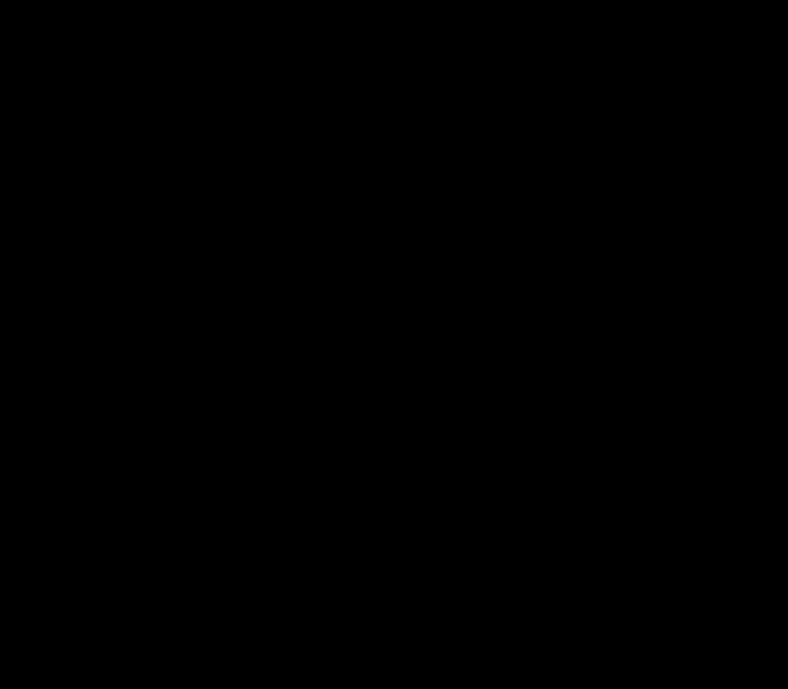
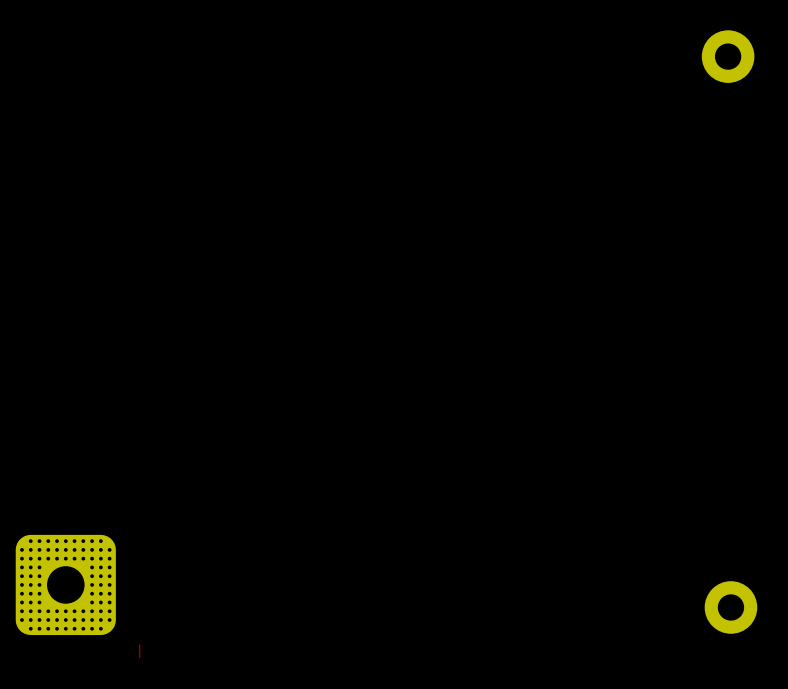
part: none -> (728, 56)
part: none -> (65, 584)
part: none -> (730, 607)
top track: none -> (139, 645) (139, 657)

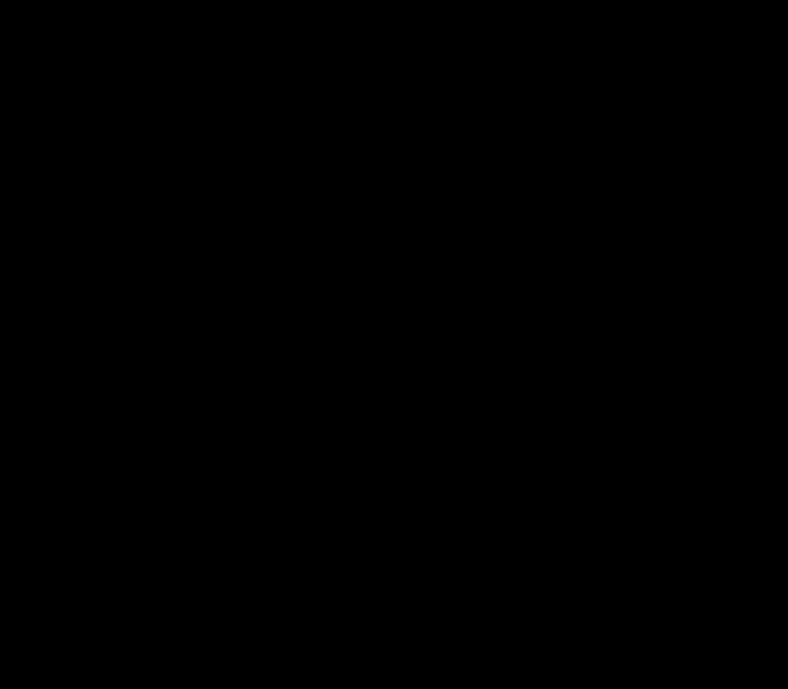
part: (728, 56) -> none
part: (65, 584) -> none
part: (730, 607) -> none
top track: (139, 645) (139, 657) -> none

